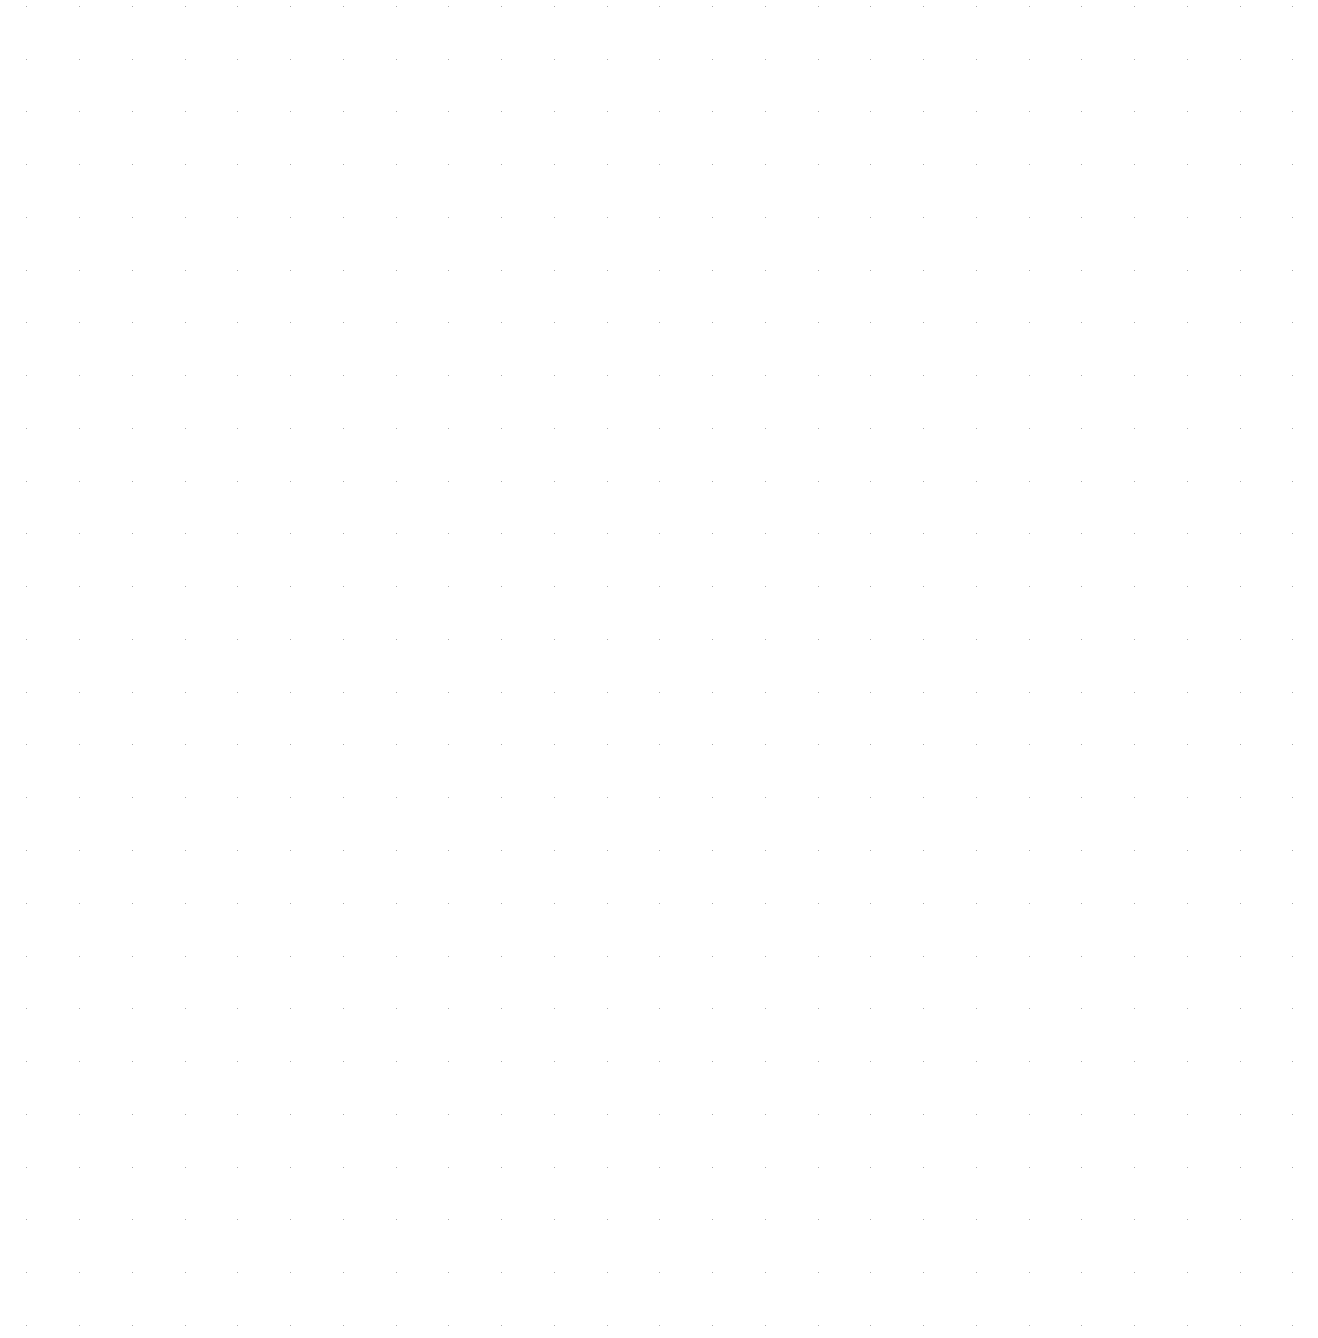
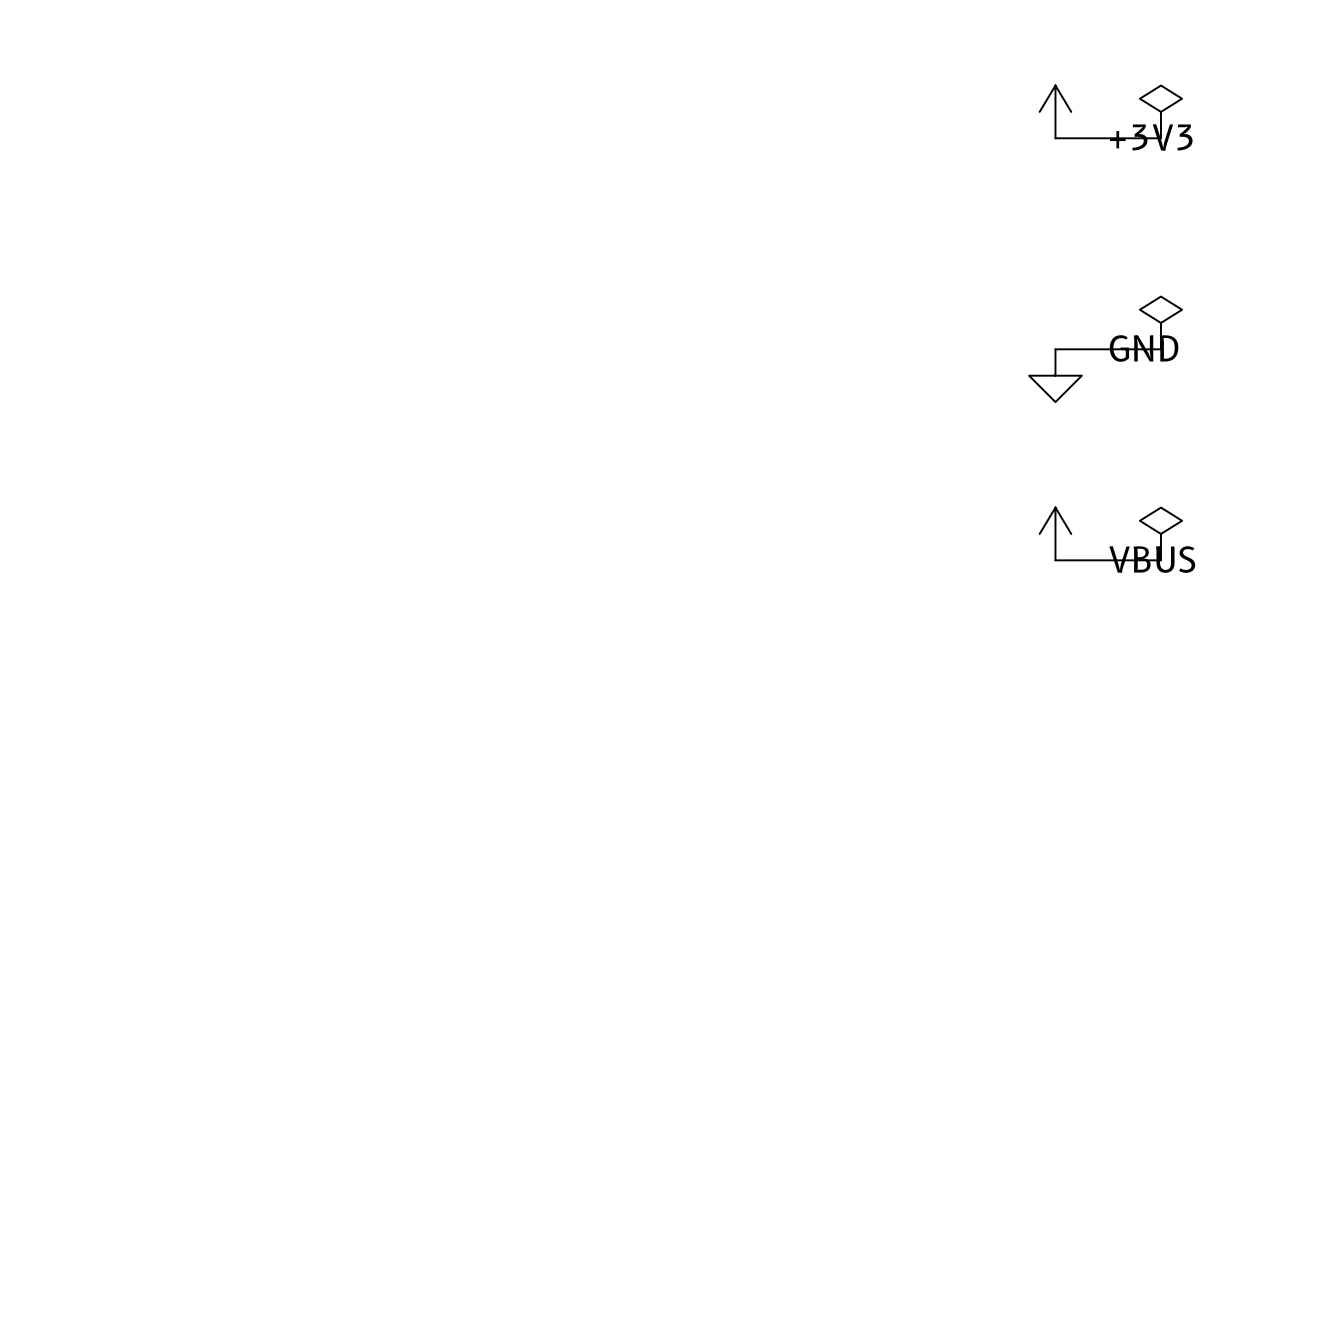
power symbol: none -> +3V3 (1055, 111)
power symbol: none -> (1160, 111)
wire: none -> (1055, 138) (1160, 138)
power symbol: none -> (1160, 322)
wire: none -> (1055, 349) (1160, 349)
power symbol: none -> GND (1055, 375)
power symbol: none -> VBUS (1055, 533)
power symbol: none -> (1160, 533)
wire: none -> (1055, 560) (1160, 560)

